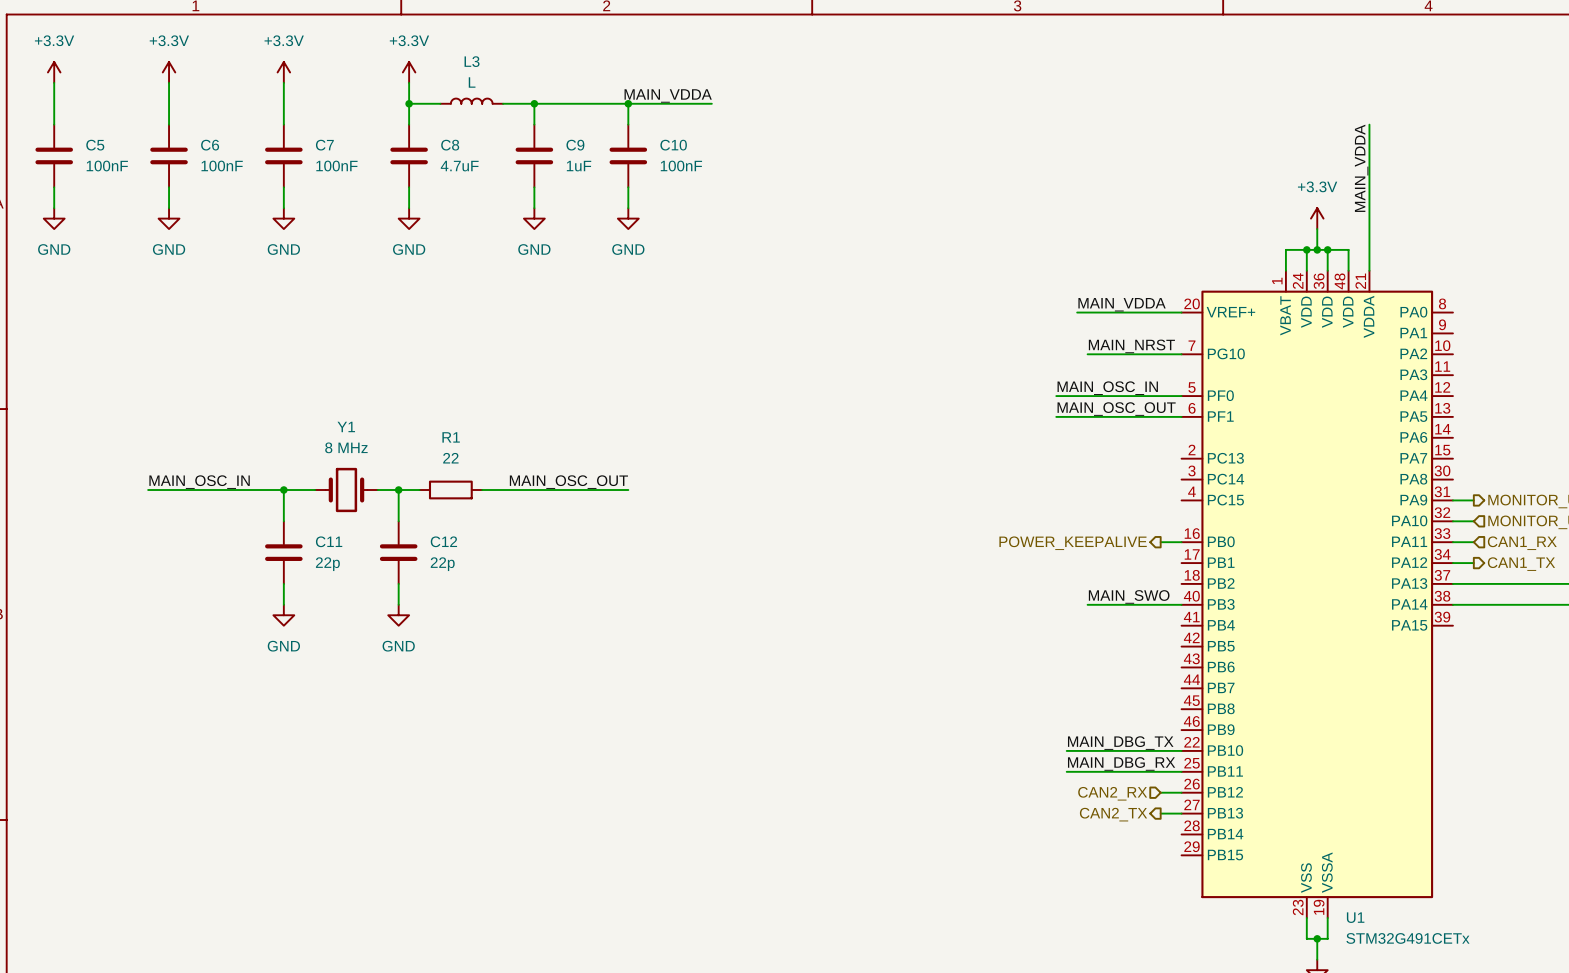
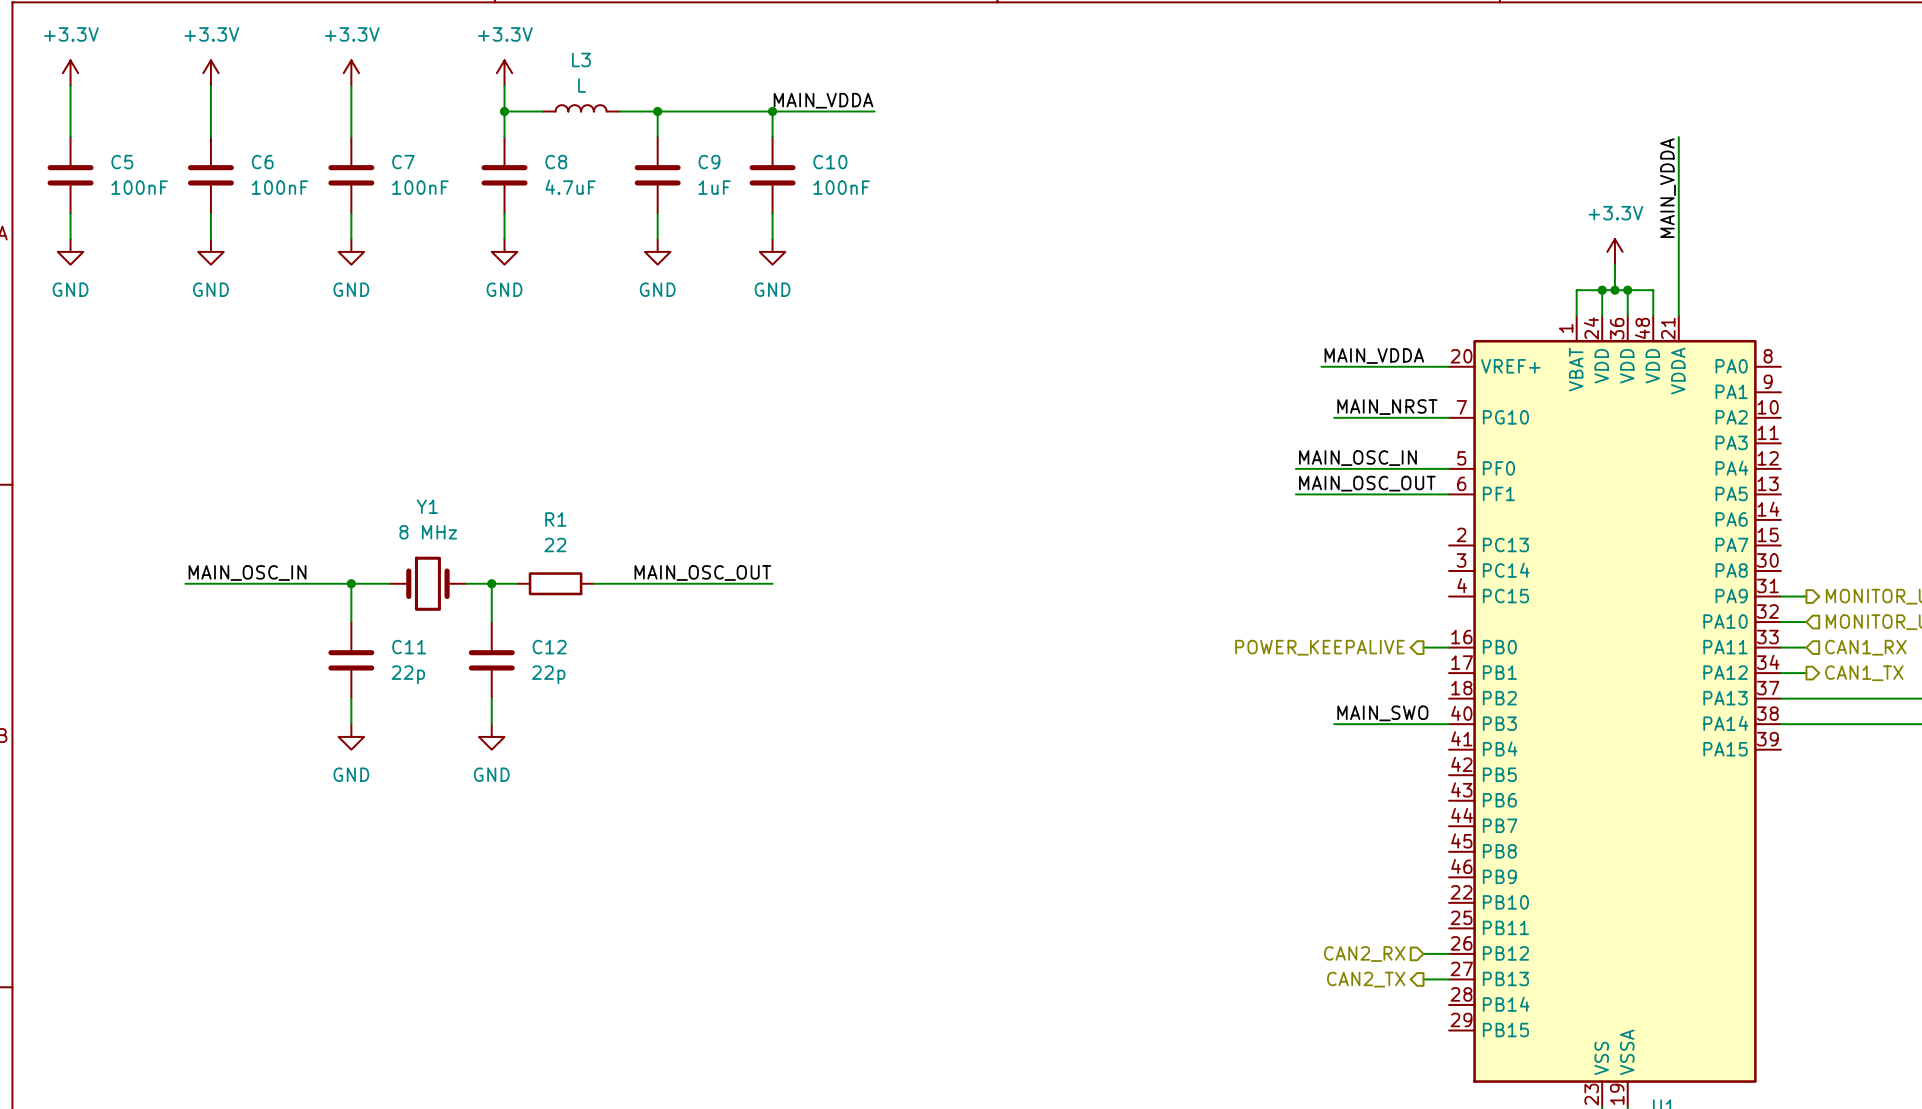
label: MAIN_DBG_TX (1120, 743) -> none
wire: (1066, 750) (1181, 750) -> none
label: MAIN_DBG_RX (1121, 763) -> none
wire: (1066, 771) (1181, 771) -> none

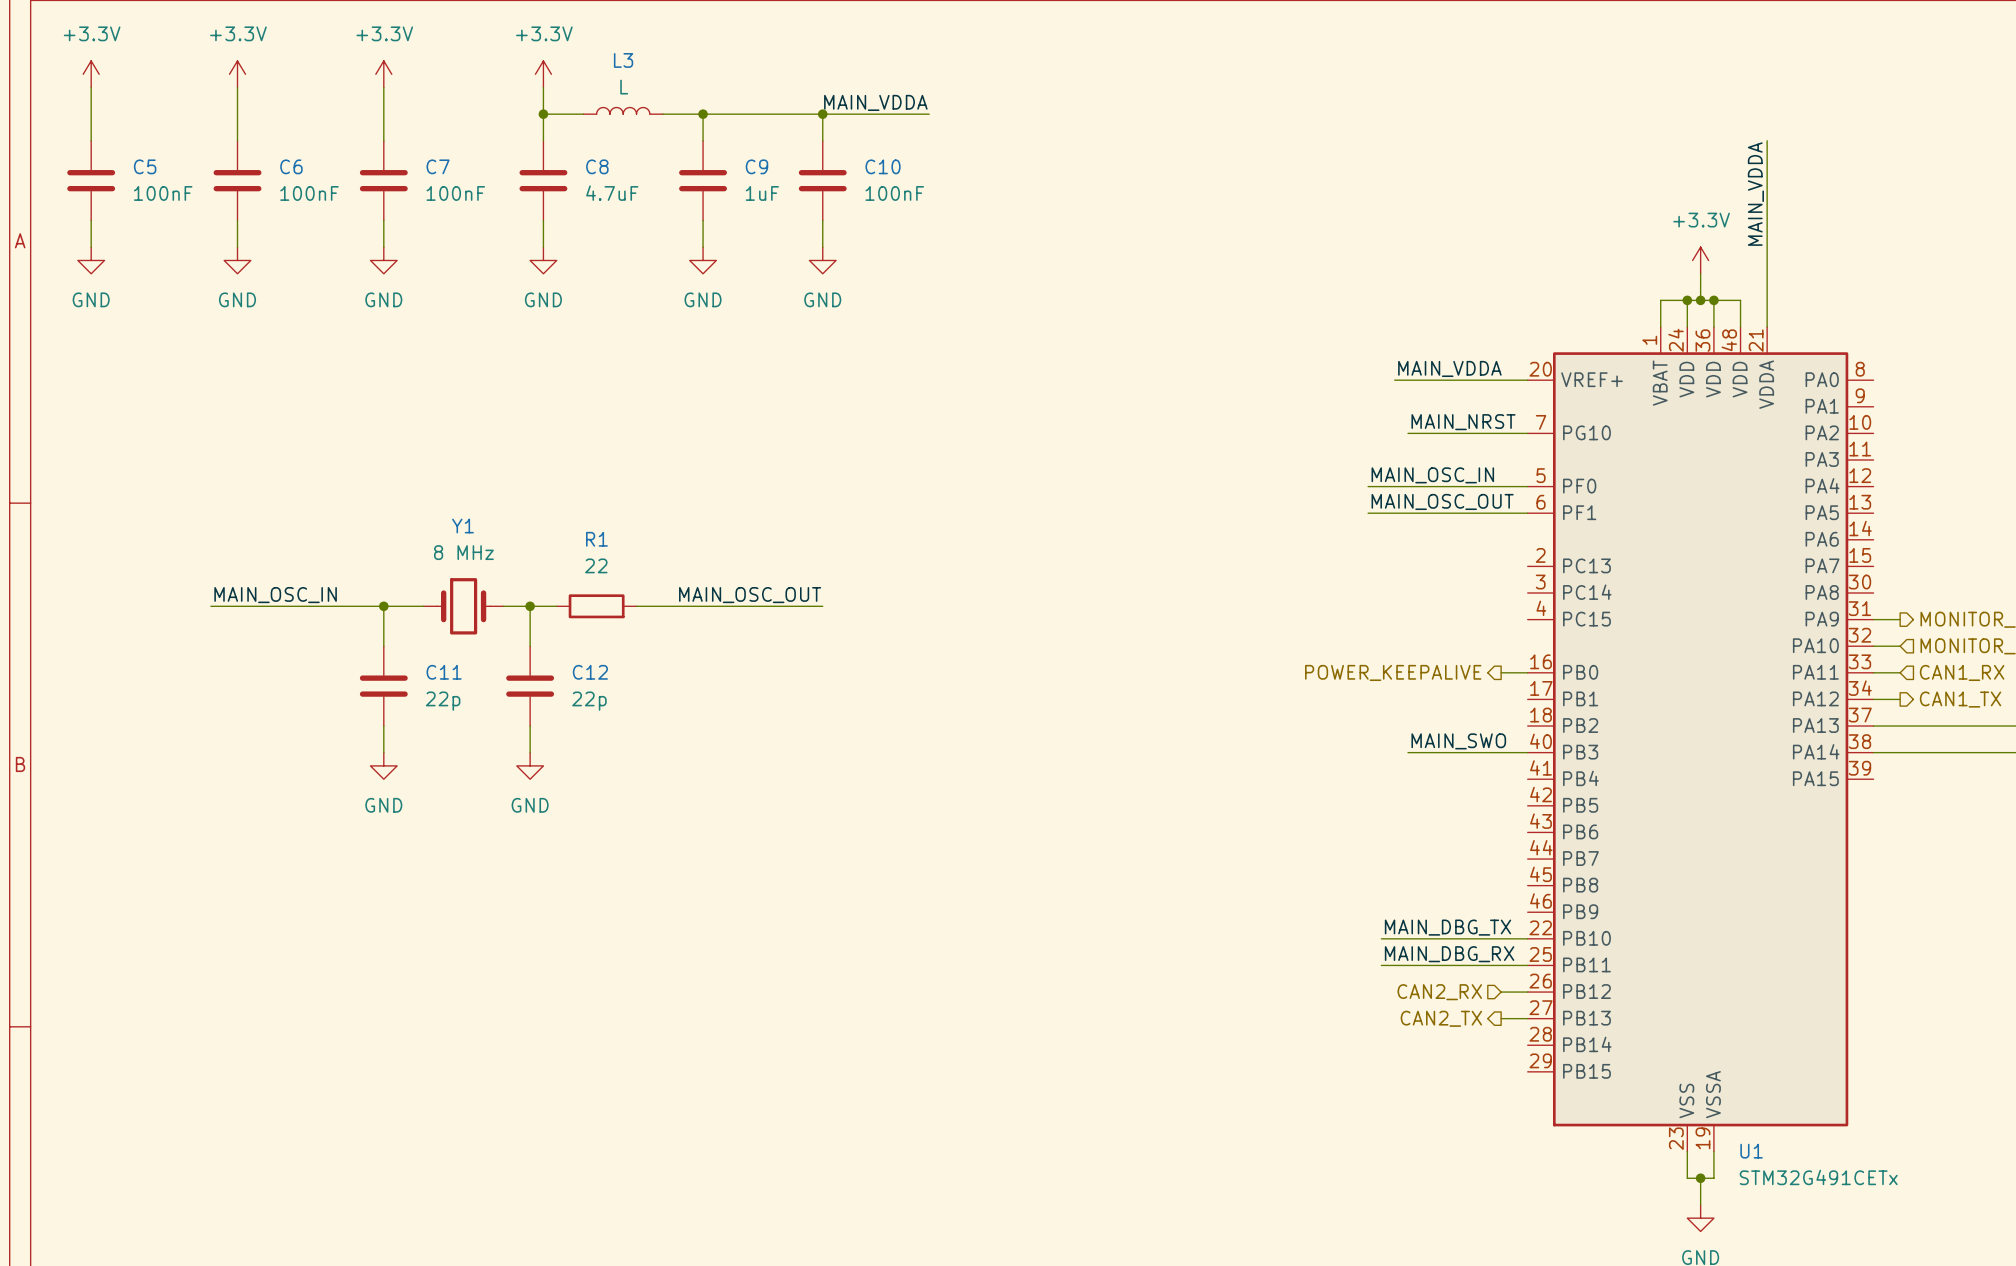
label: none -> MAIN_DBG_TX (1448, 927)
wire: none -> (1381, 938) (1527, 938)
label: none -> MAIN_DBG_RX (1449, 954)
wire: none -> (1381, 965) (1527, 965)

